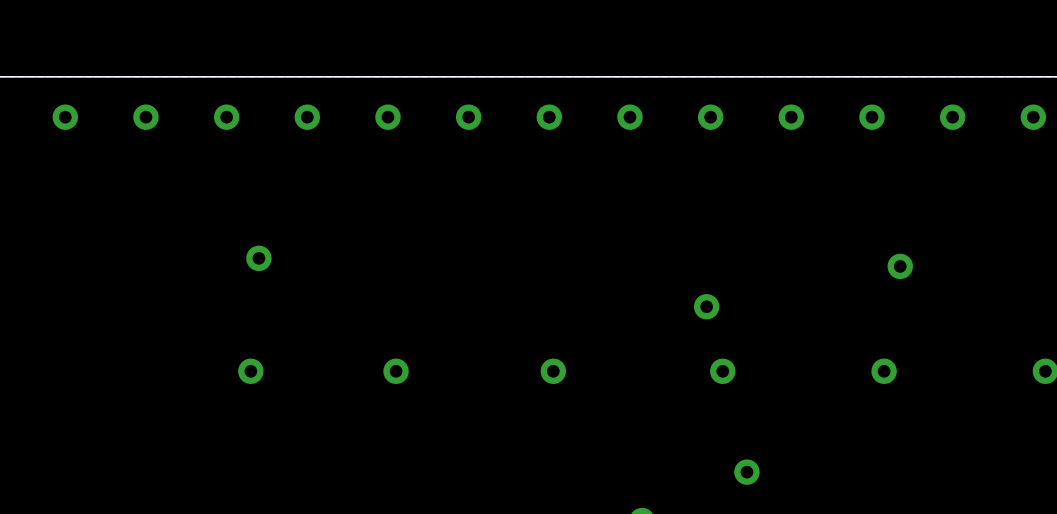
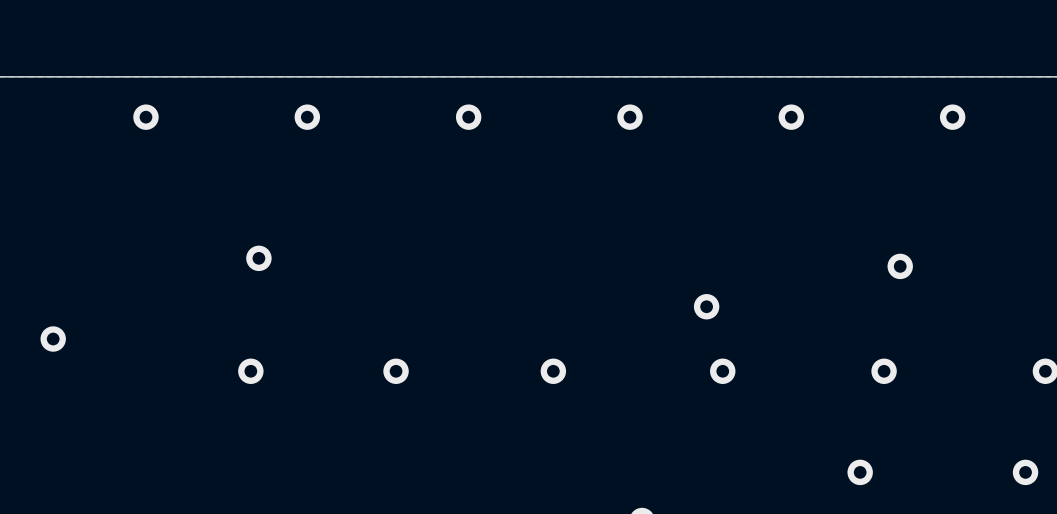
via: (65, 117) -> none
via: (226, 117) -> none
via: (387, 117) -> none
via: (549, 117) -> none
via: (710, 117) -> none
via: (871, 117) -> none
via: (1033, 117) -> none
via: none -> (53, 339)
via position: (746, 472) -> (860, 472)
via: none -> (1025, 472)

